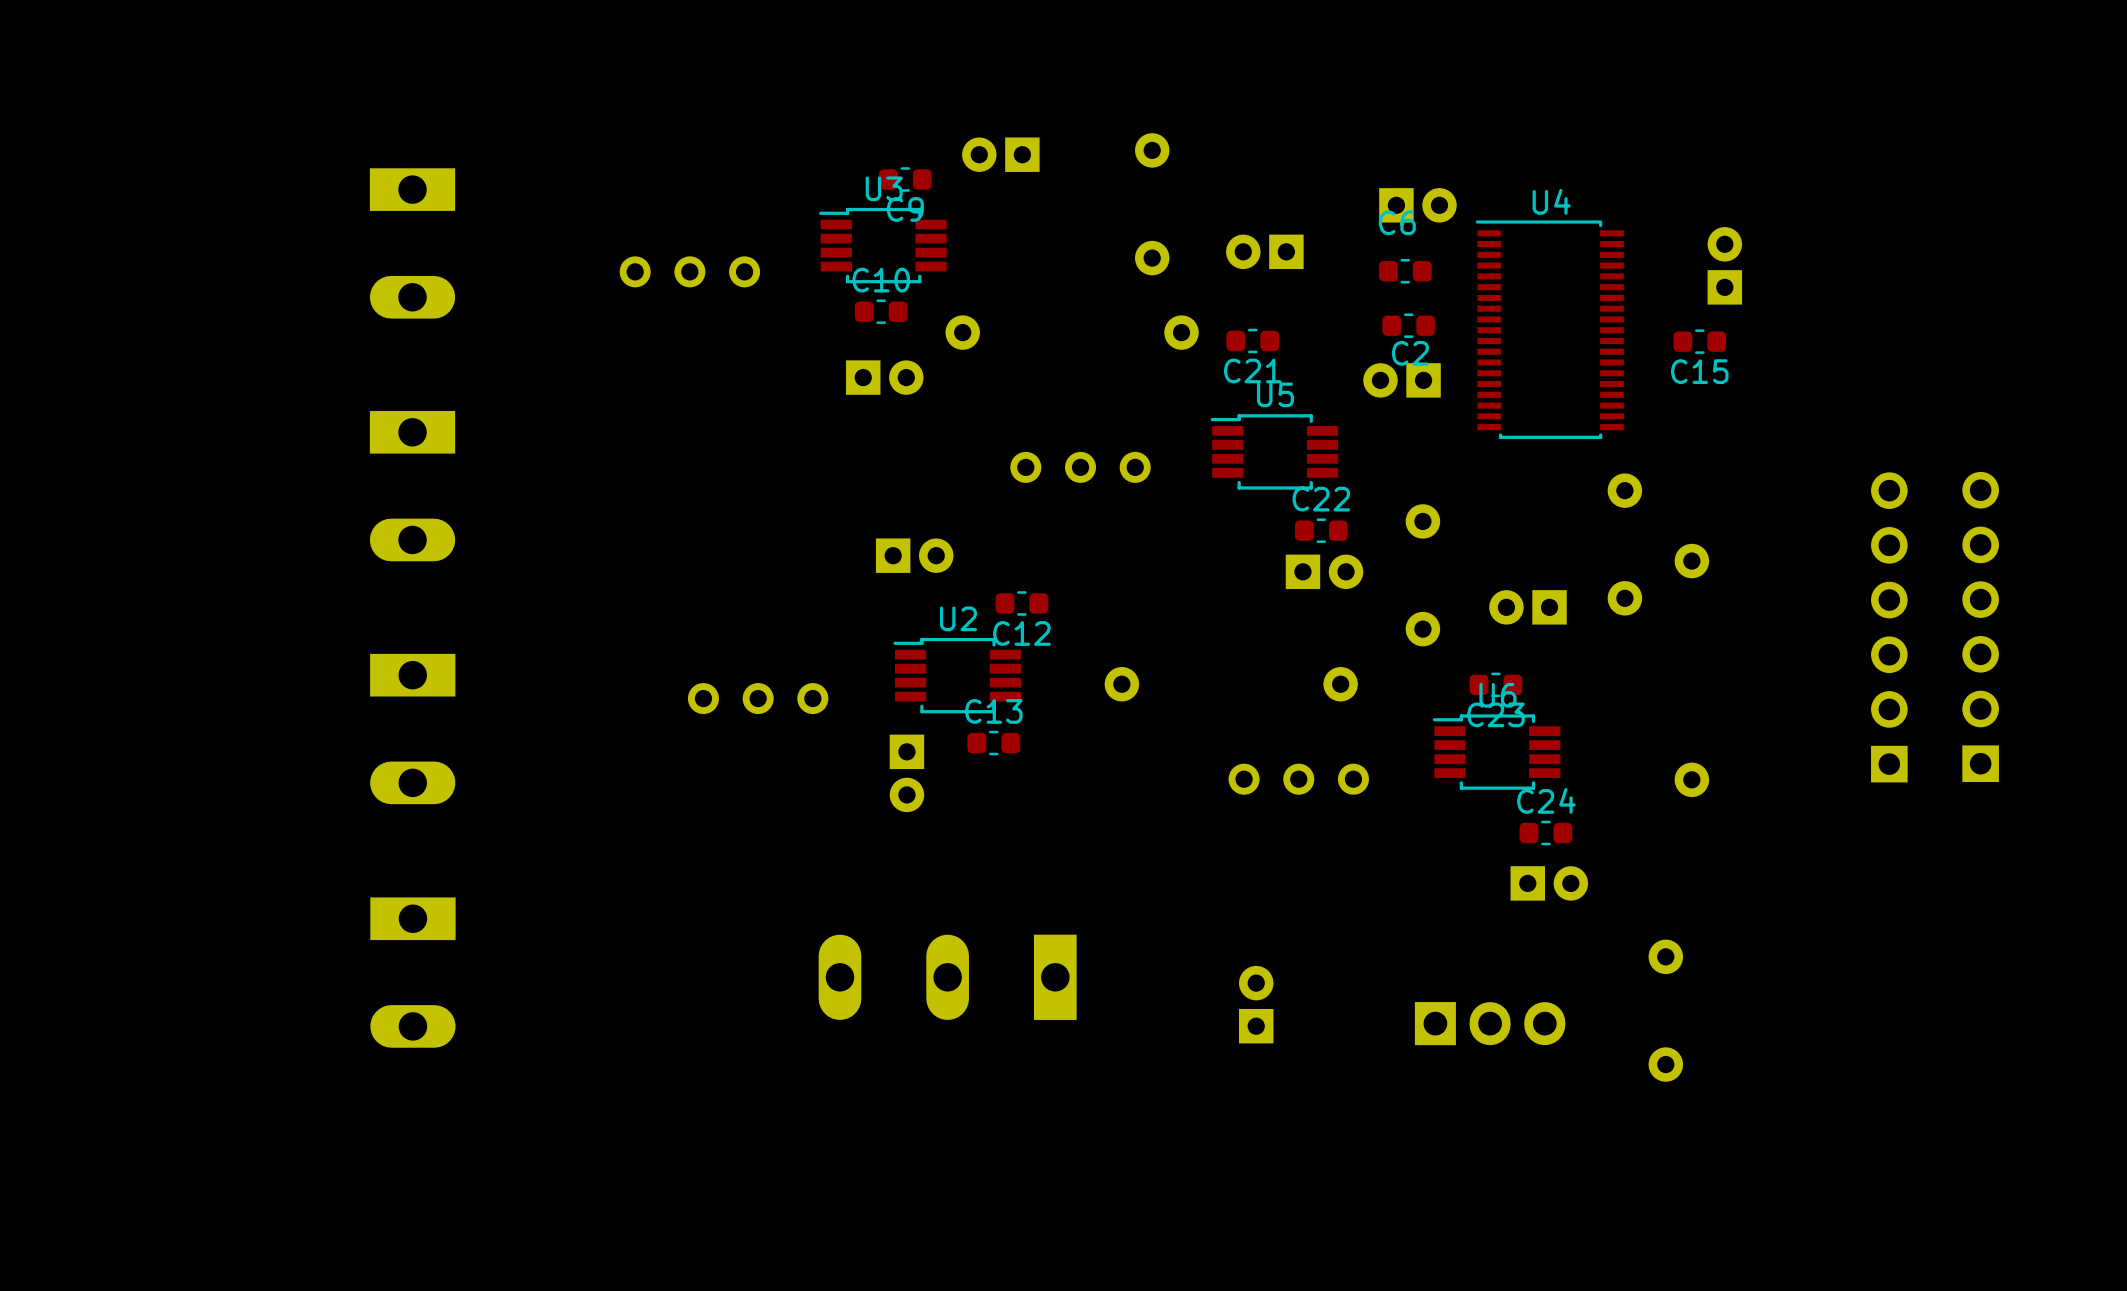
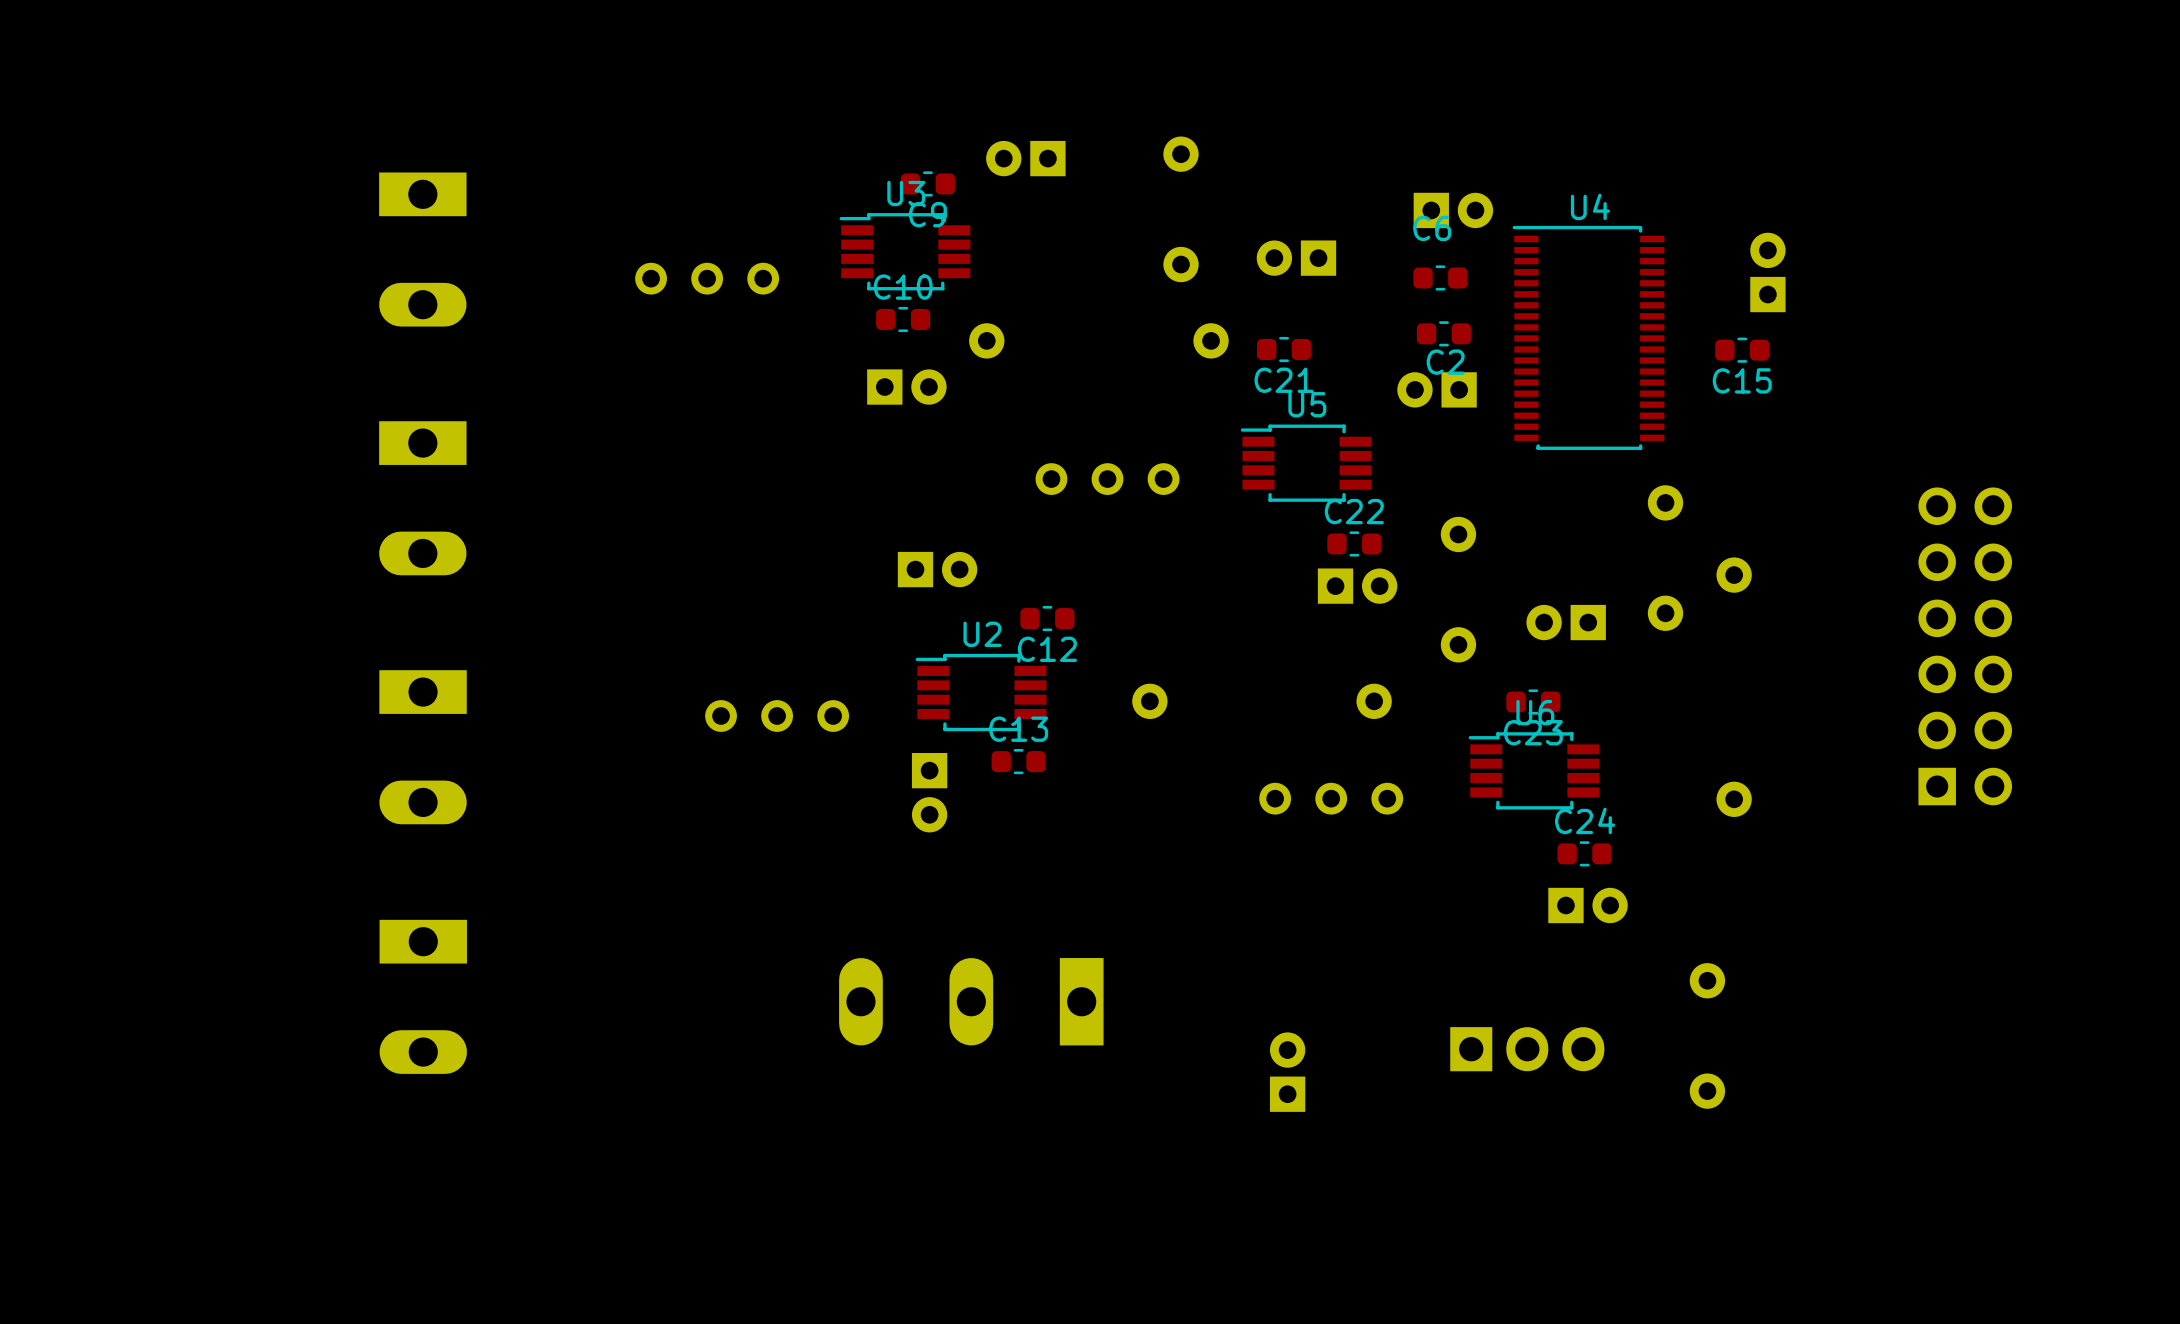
part: (1980, 626) -> none
part: (1889, 627) -> none
part: none -> (1965, 646)
part position: (1256, 1004) -> (1287, 1072)

